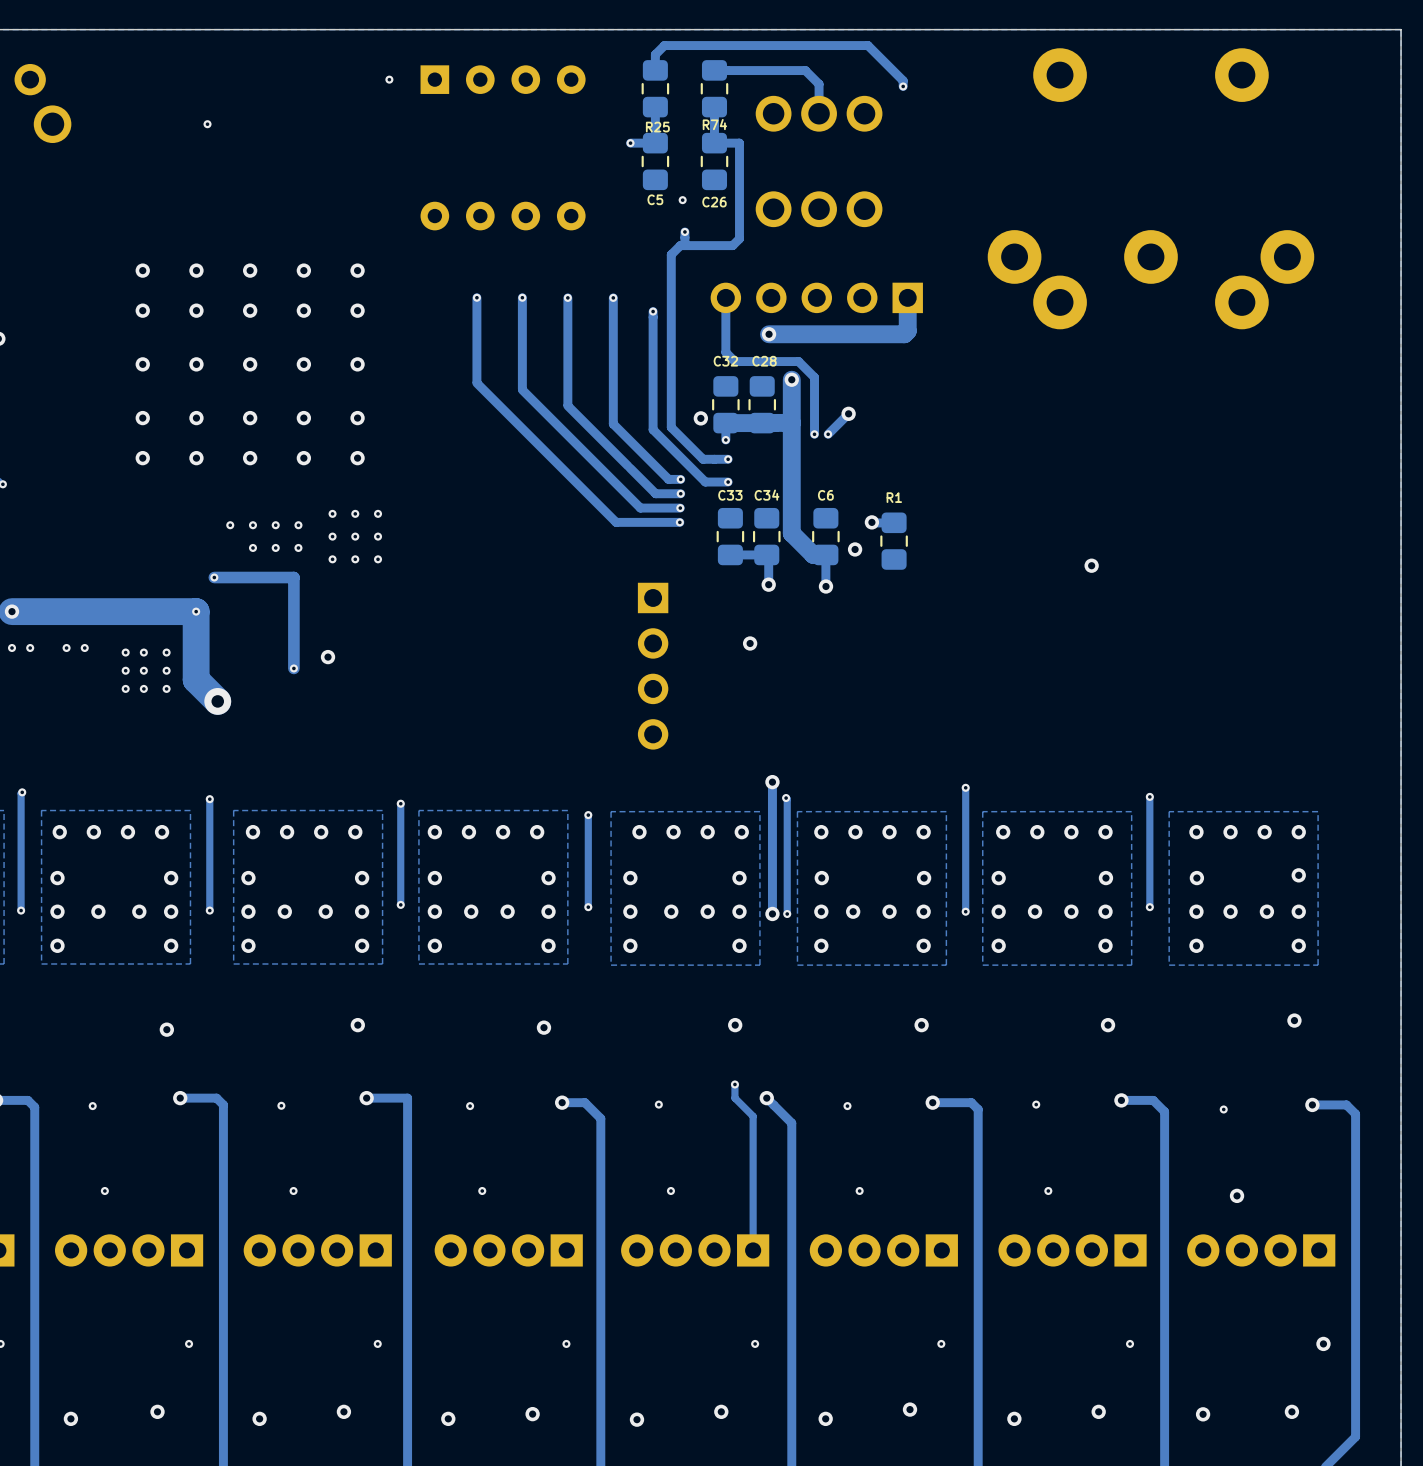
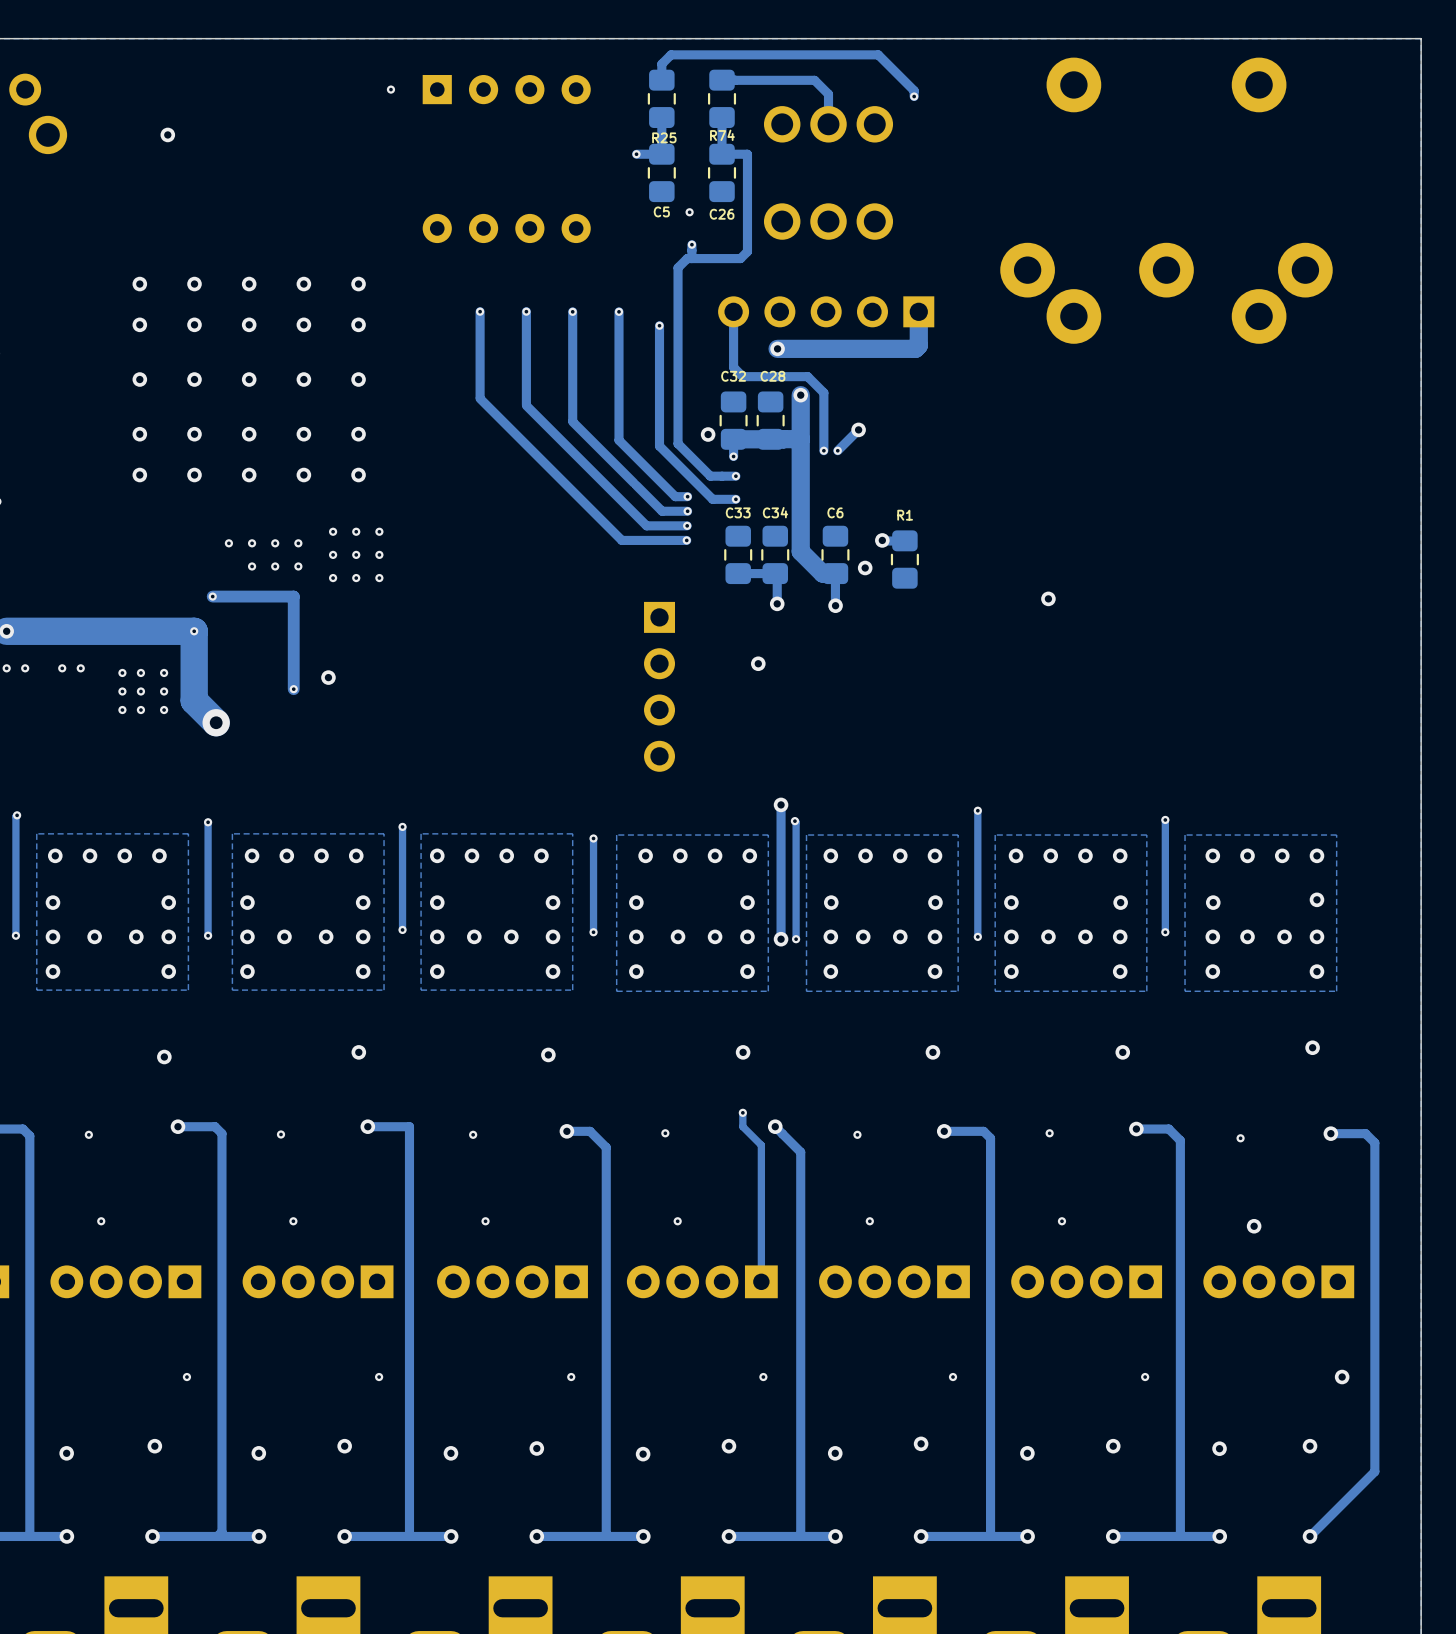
via: none -> (167, 134)
via: (207, 124) -> none
via position: (1091, 565) -> (1048, 598)

